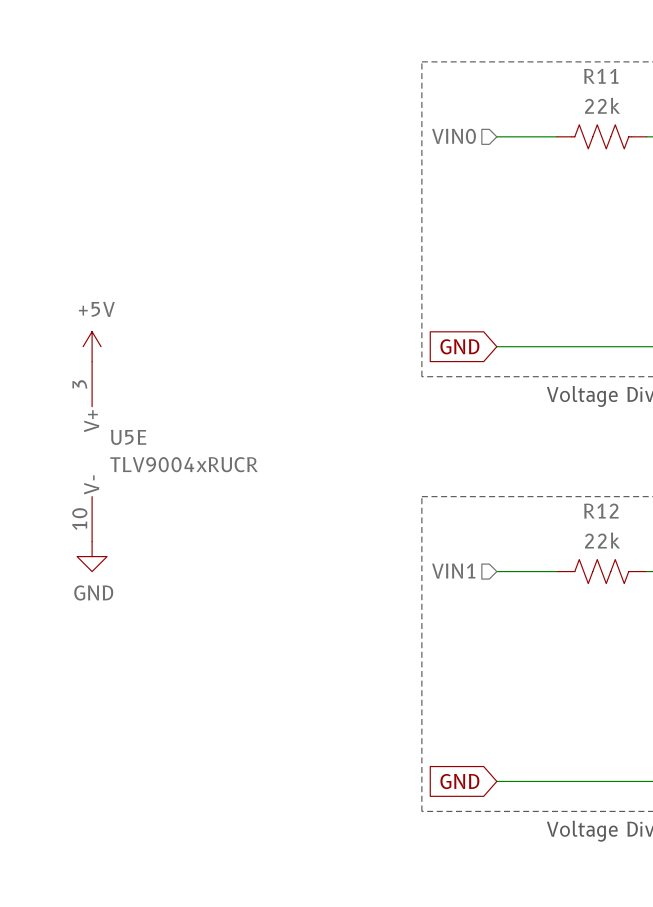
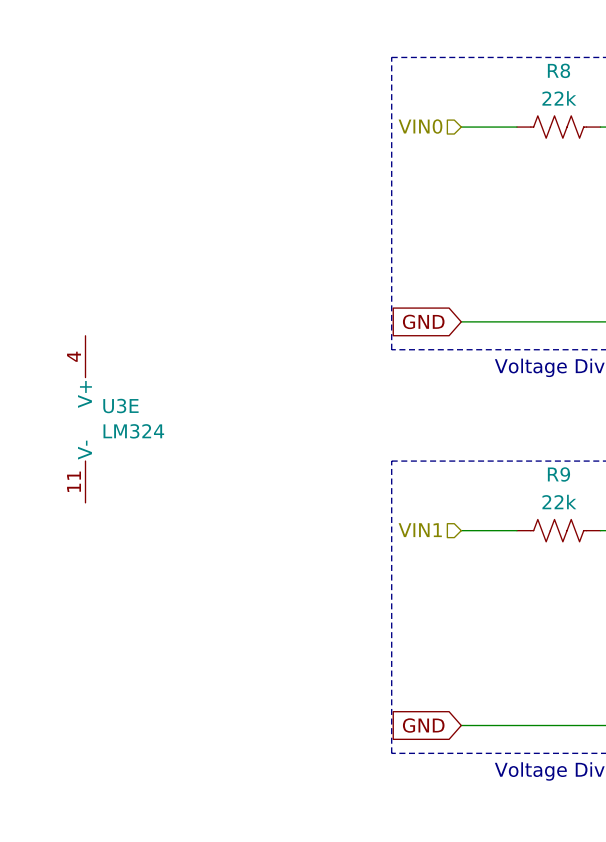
R11 name: R11 (601, 76) -> R8 (558, 70)
power symbol: +5V (92, 346) -> none
U5E pin number: 3 (79, 384) -> 4 (74, 356)
U5E name: U5E (128, 437) -> U3E (120, 406)
U5E value: TLV9004xRUCR (184, 464) -> LM324 (133, 431)
R12 name: R12 (601, 511) -> R9 (558, 474)
U5E pin number: 10 (79, 519) -> 11 (74, 481)
power symbol: GND (92, 556) -> none

